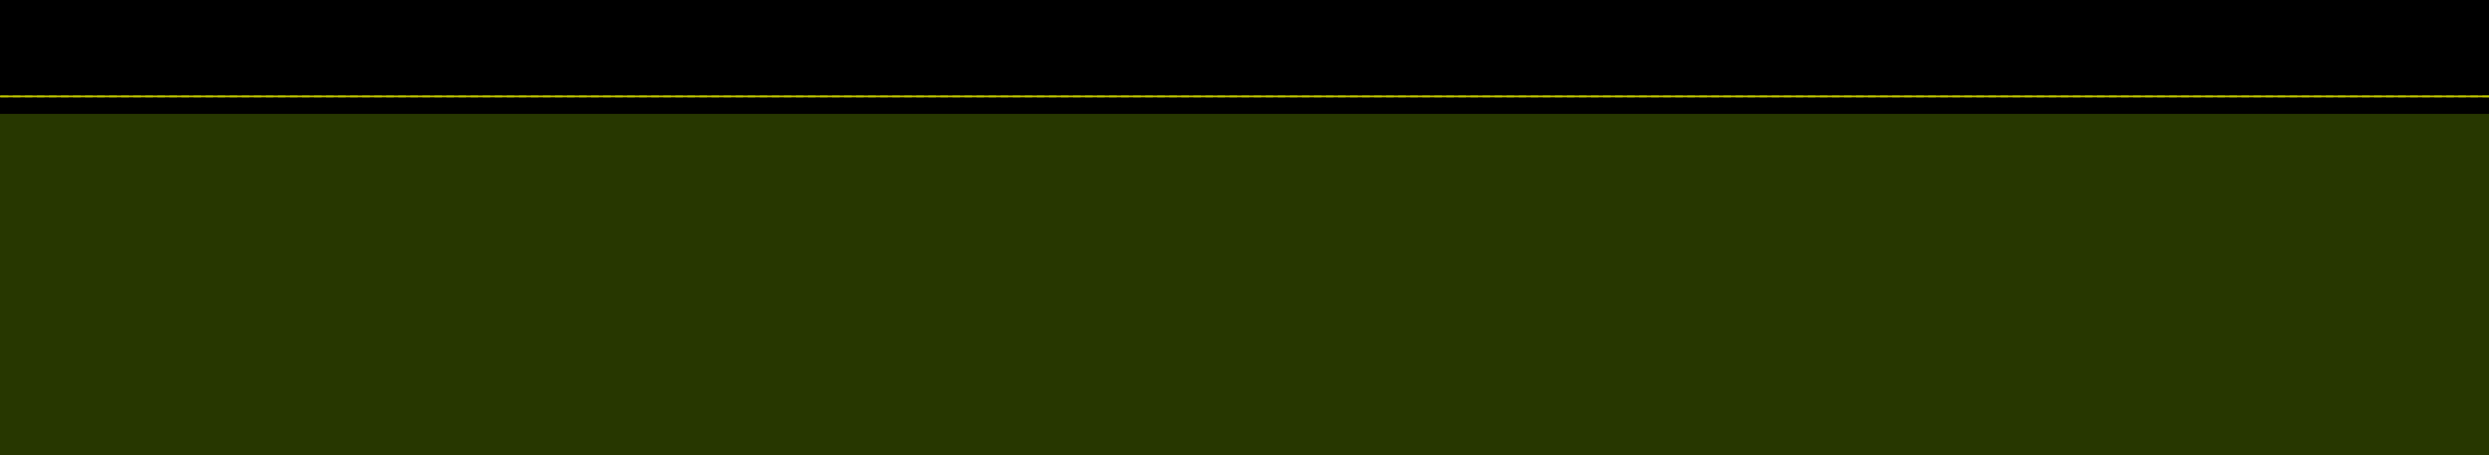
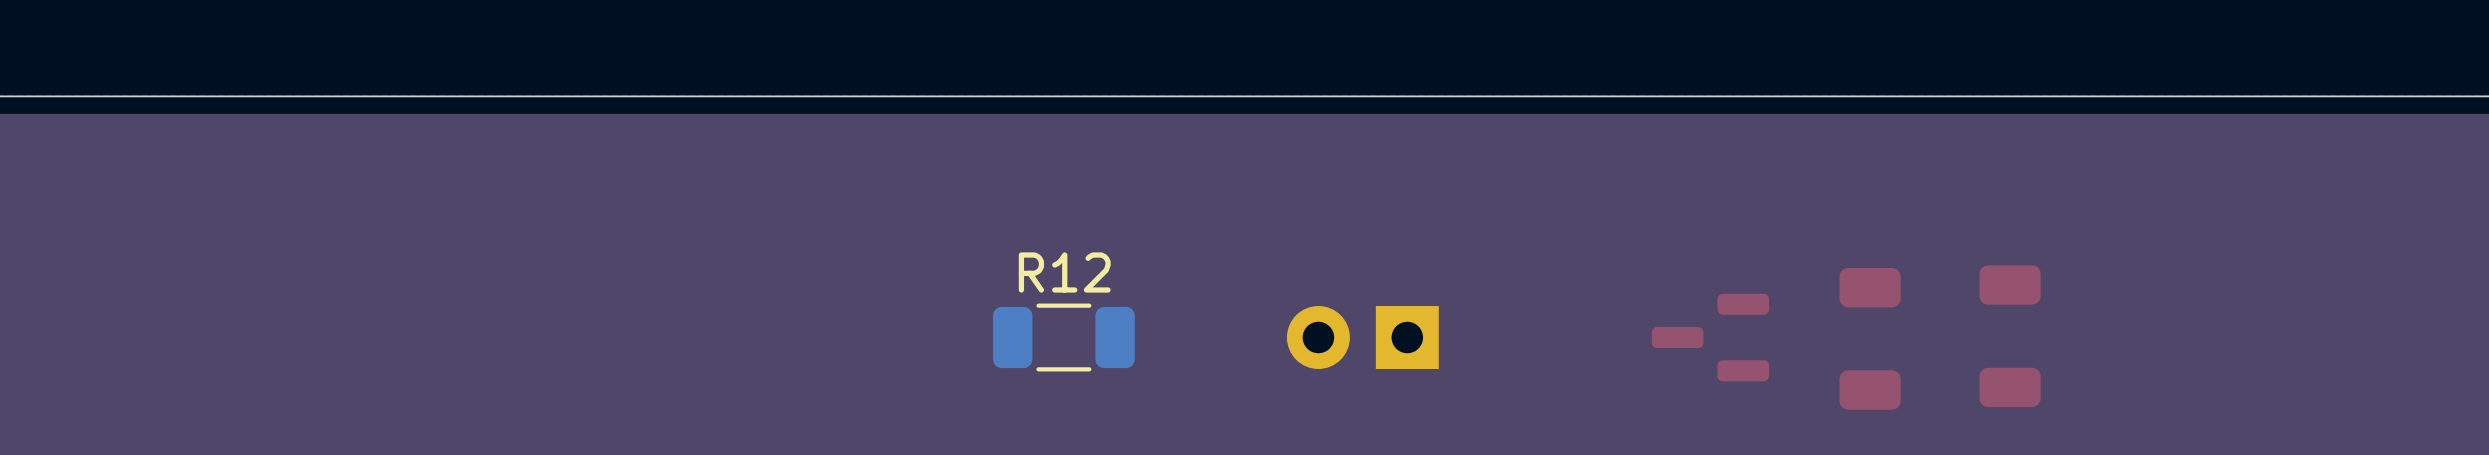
part: none -> (2010, 336)
R12: none -> (1063, 337)
part: none -> (1362, 337)
part: none -> (1710, 337)
part: none -> (1870, 338)

